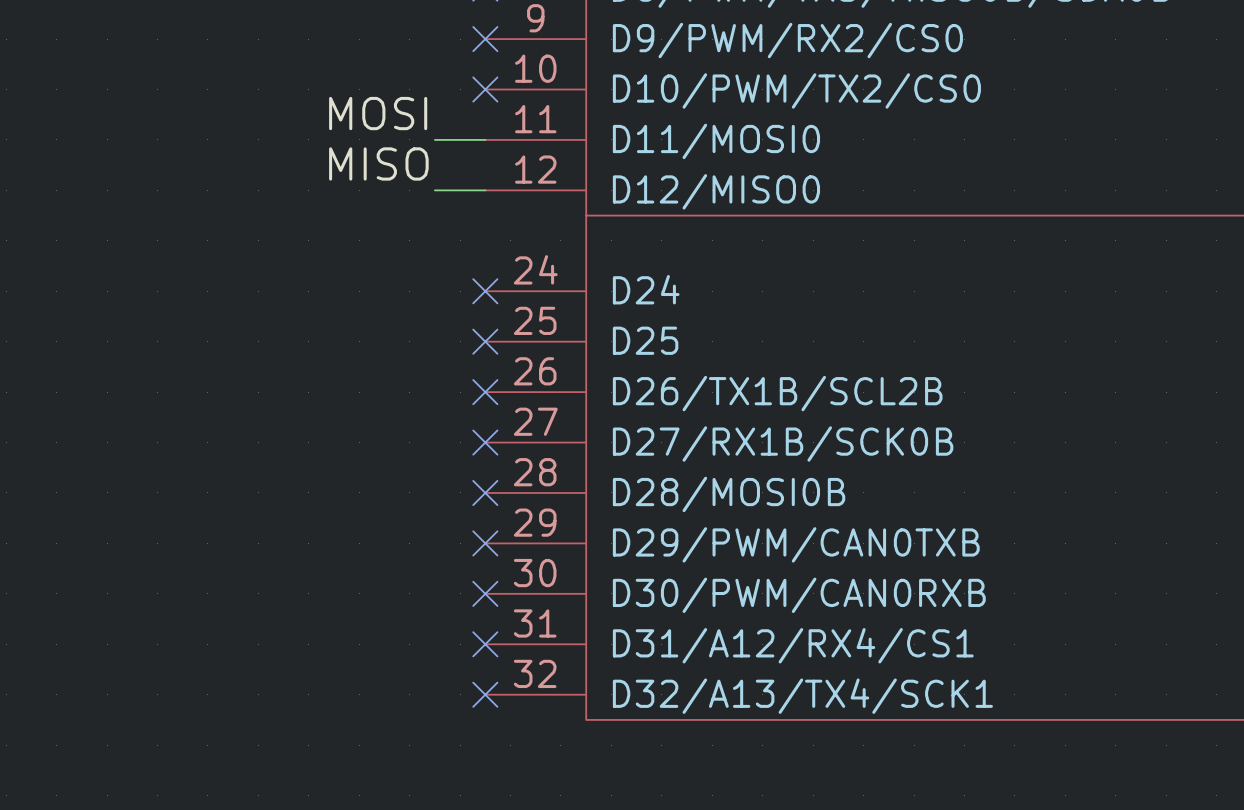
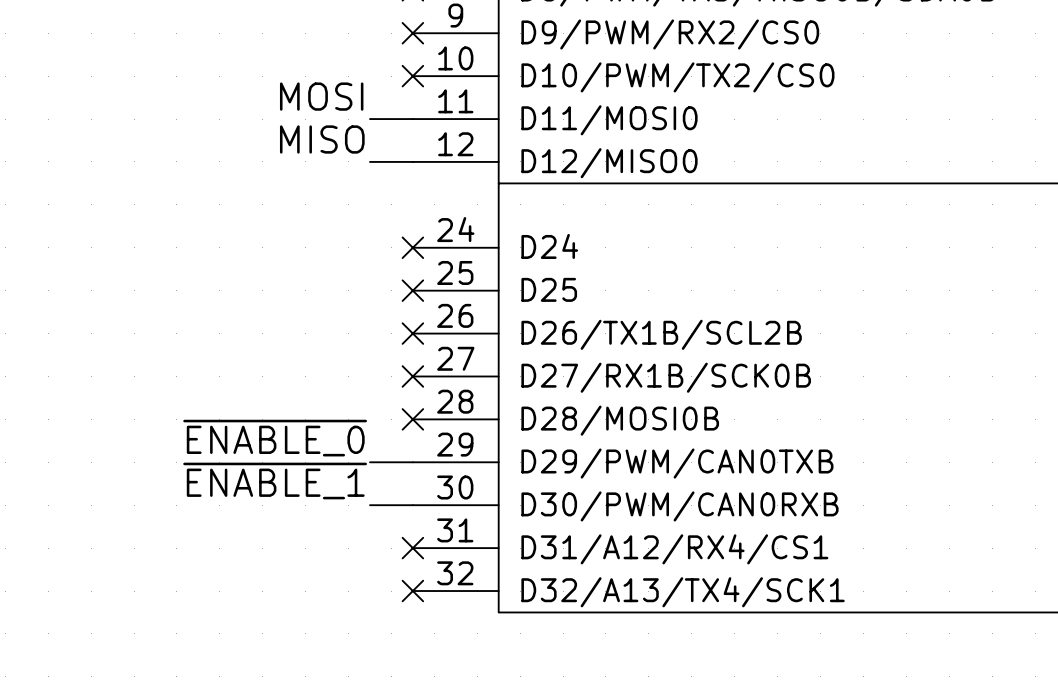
label: none -> ~{ENABLE_0} (275, 438)
wire: none -> (369, 462) (412, 462)
no-connect mark: (485, 543) -> none
label: none -> ~{ENABLE_1} (275, 481)
wire: none -> (369, 505) (412, 505)
no-connect mark: (485, 593) -> none

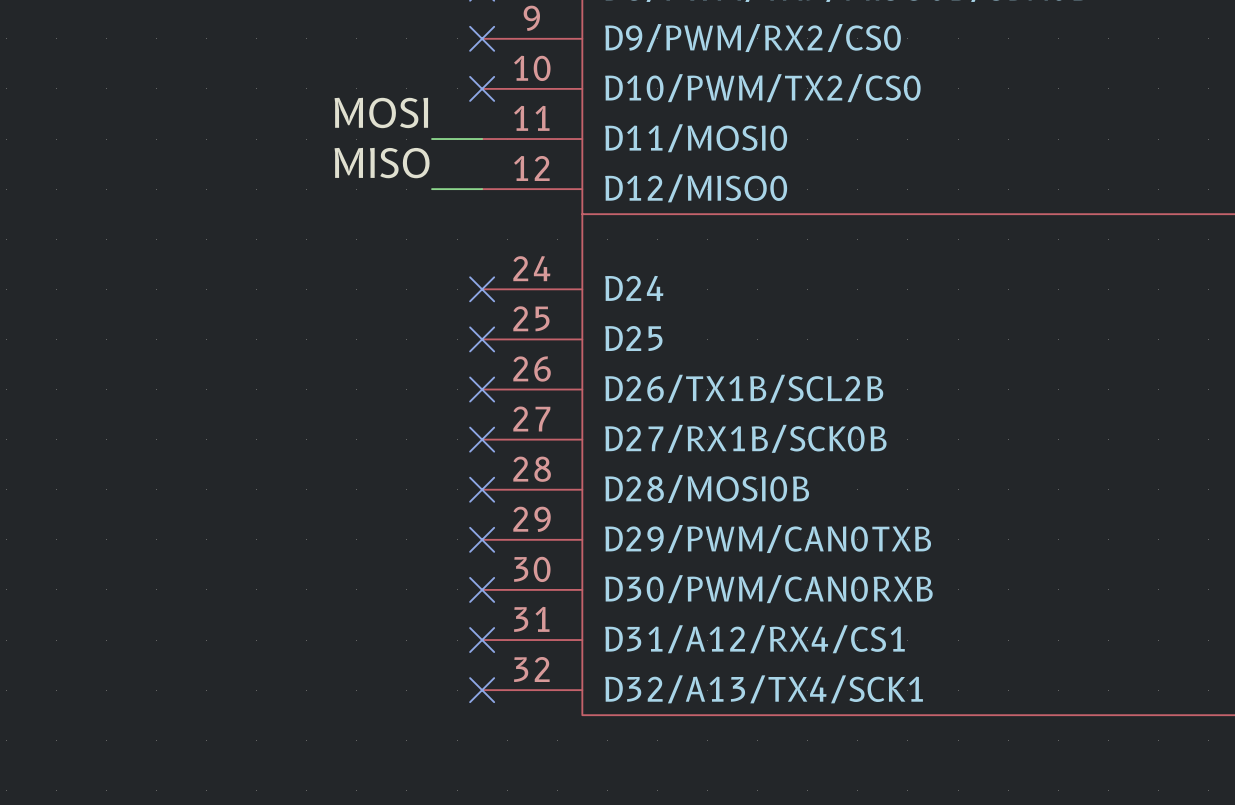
label: ~{ENABLE_0} (275, 438) -> none
wire: (369, 462) (412, 462) -> none
no-connect mark: none -> (482, 539)
label: ~{ENABLE_1} (275, 481) -> none
wire: (369, 505) (412, 505) -> none
no-connect mark: none -> (482, 589)

